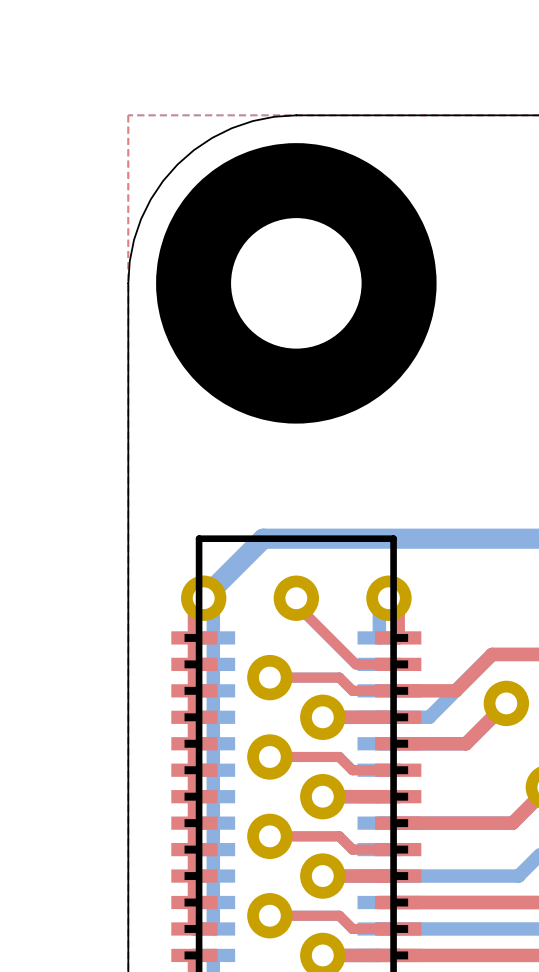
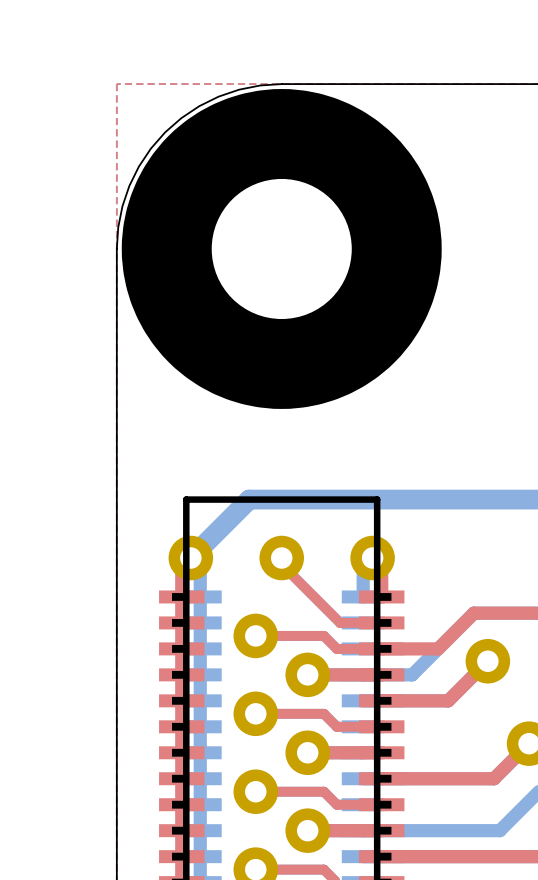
part footprint: [156, 143, 437, 424] -> [121, 89, 442, 409]

